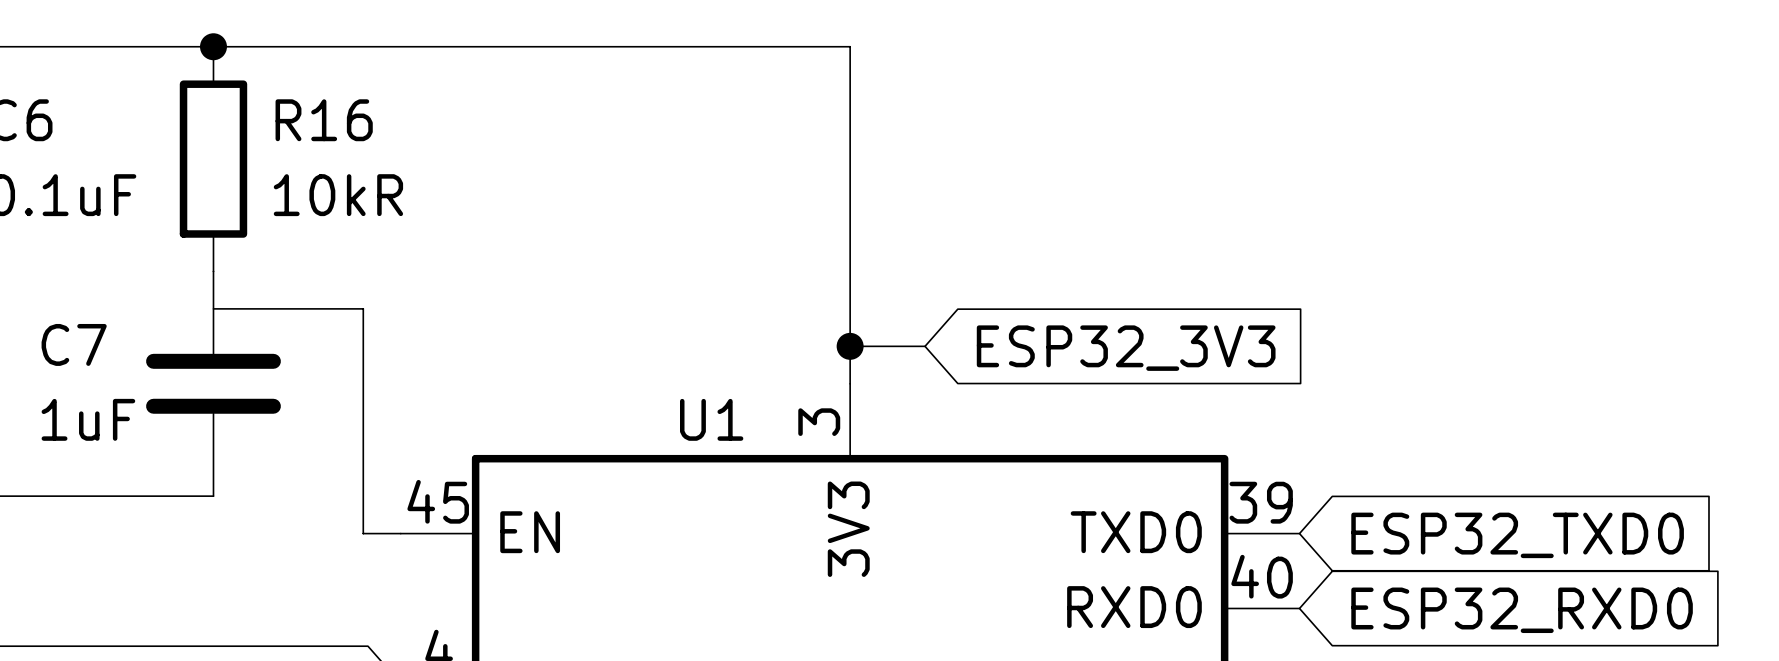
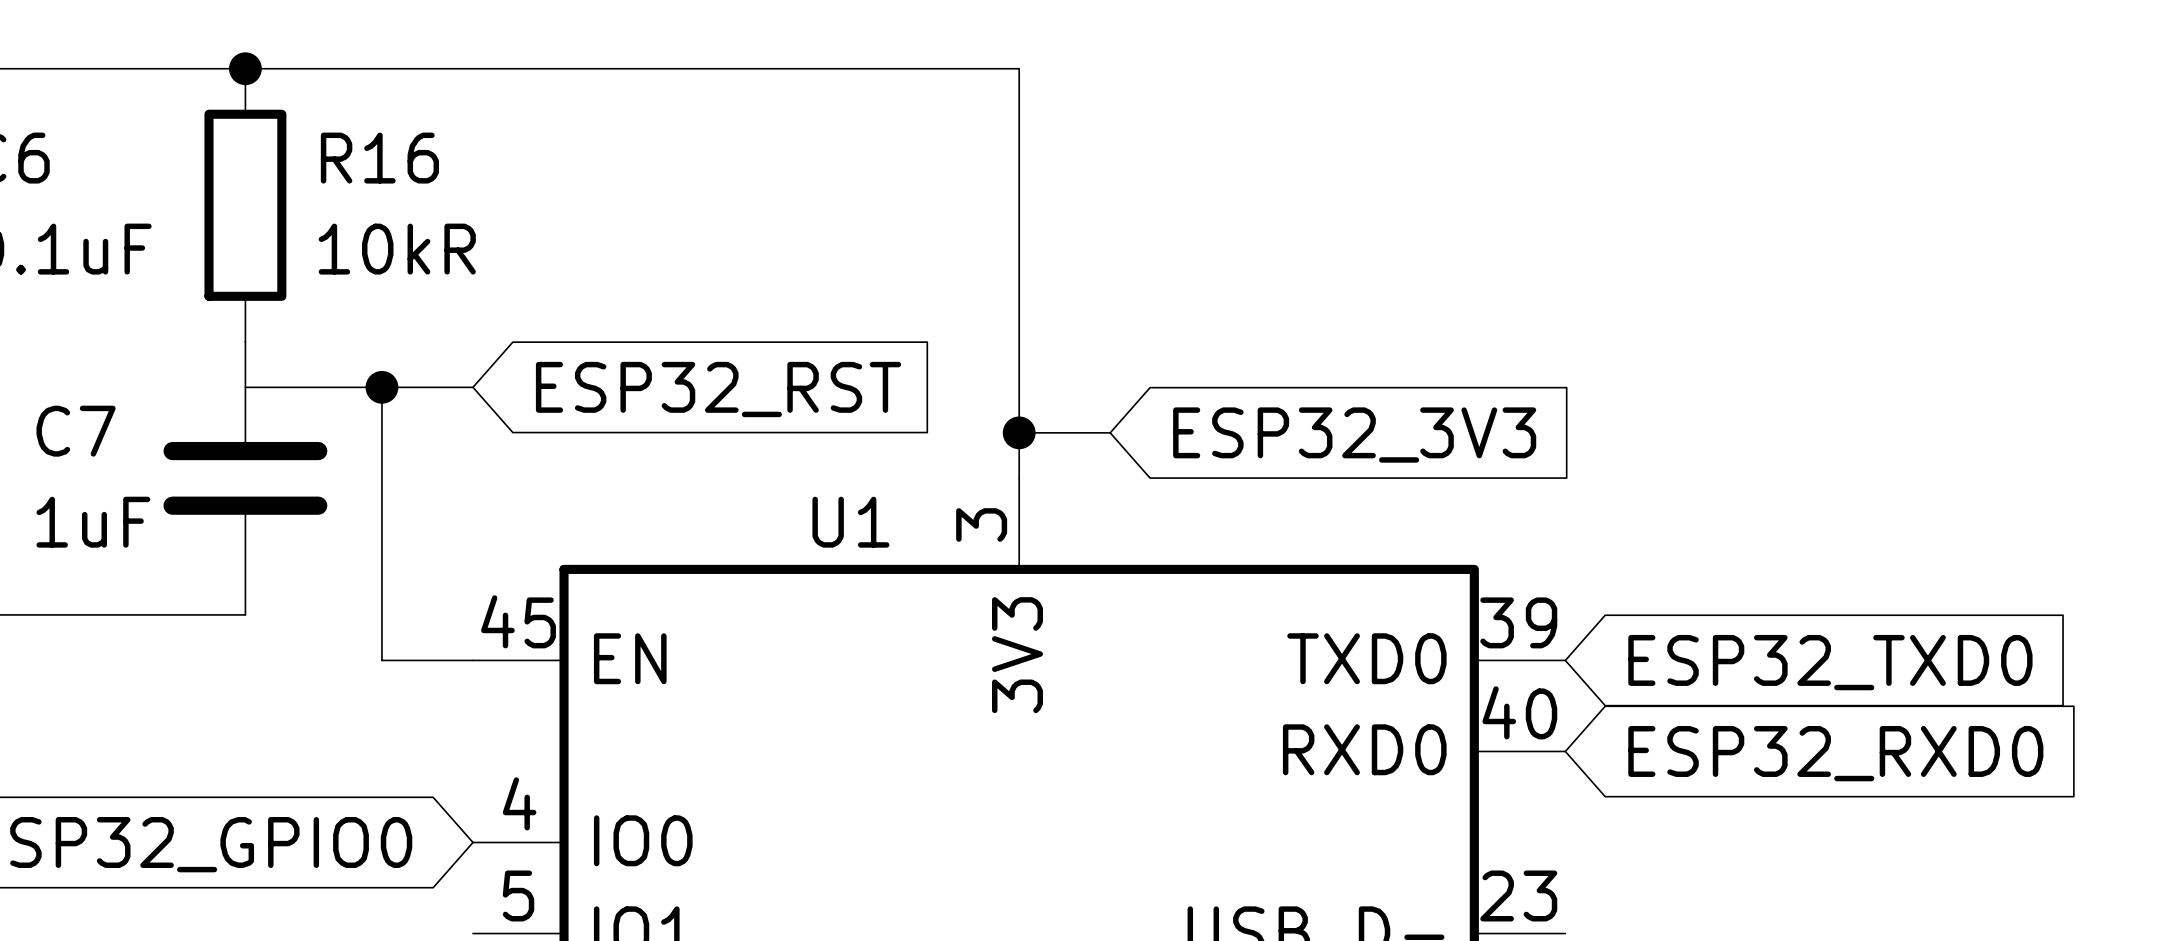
junction: none -> (381, 387)
wire: (363, 308) (363, 533) -> (381, 387) (381, 660) (427, 660)
wire: none -> (427, 387) (473, 387)
global label: none -> ESP32_RST (718, 389)

